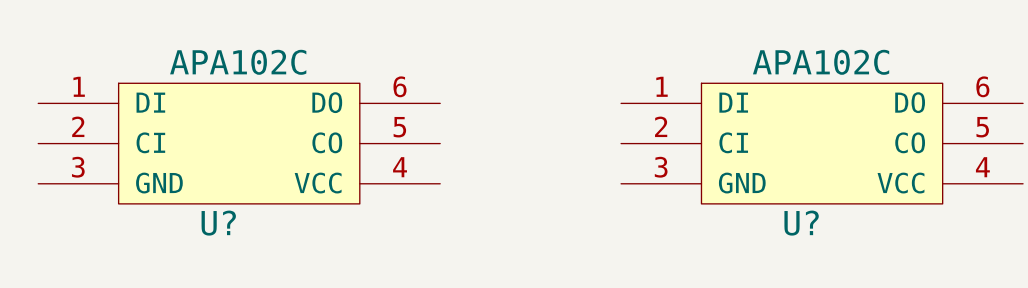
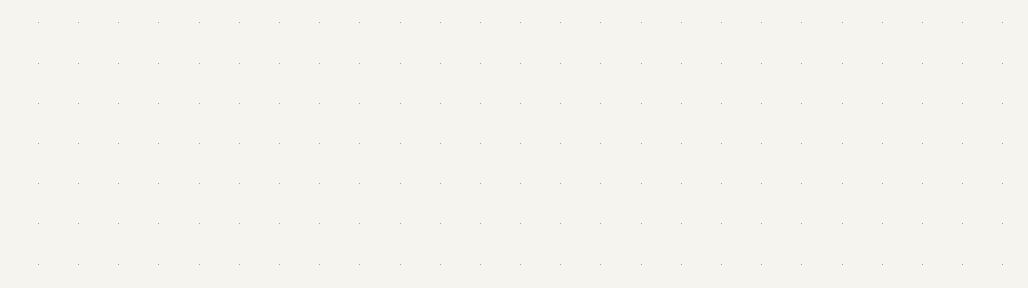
U?: APA102C (239, 143) -> none
U?: APA102C (822, 143) -> none

